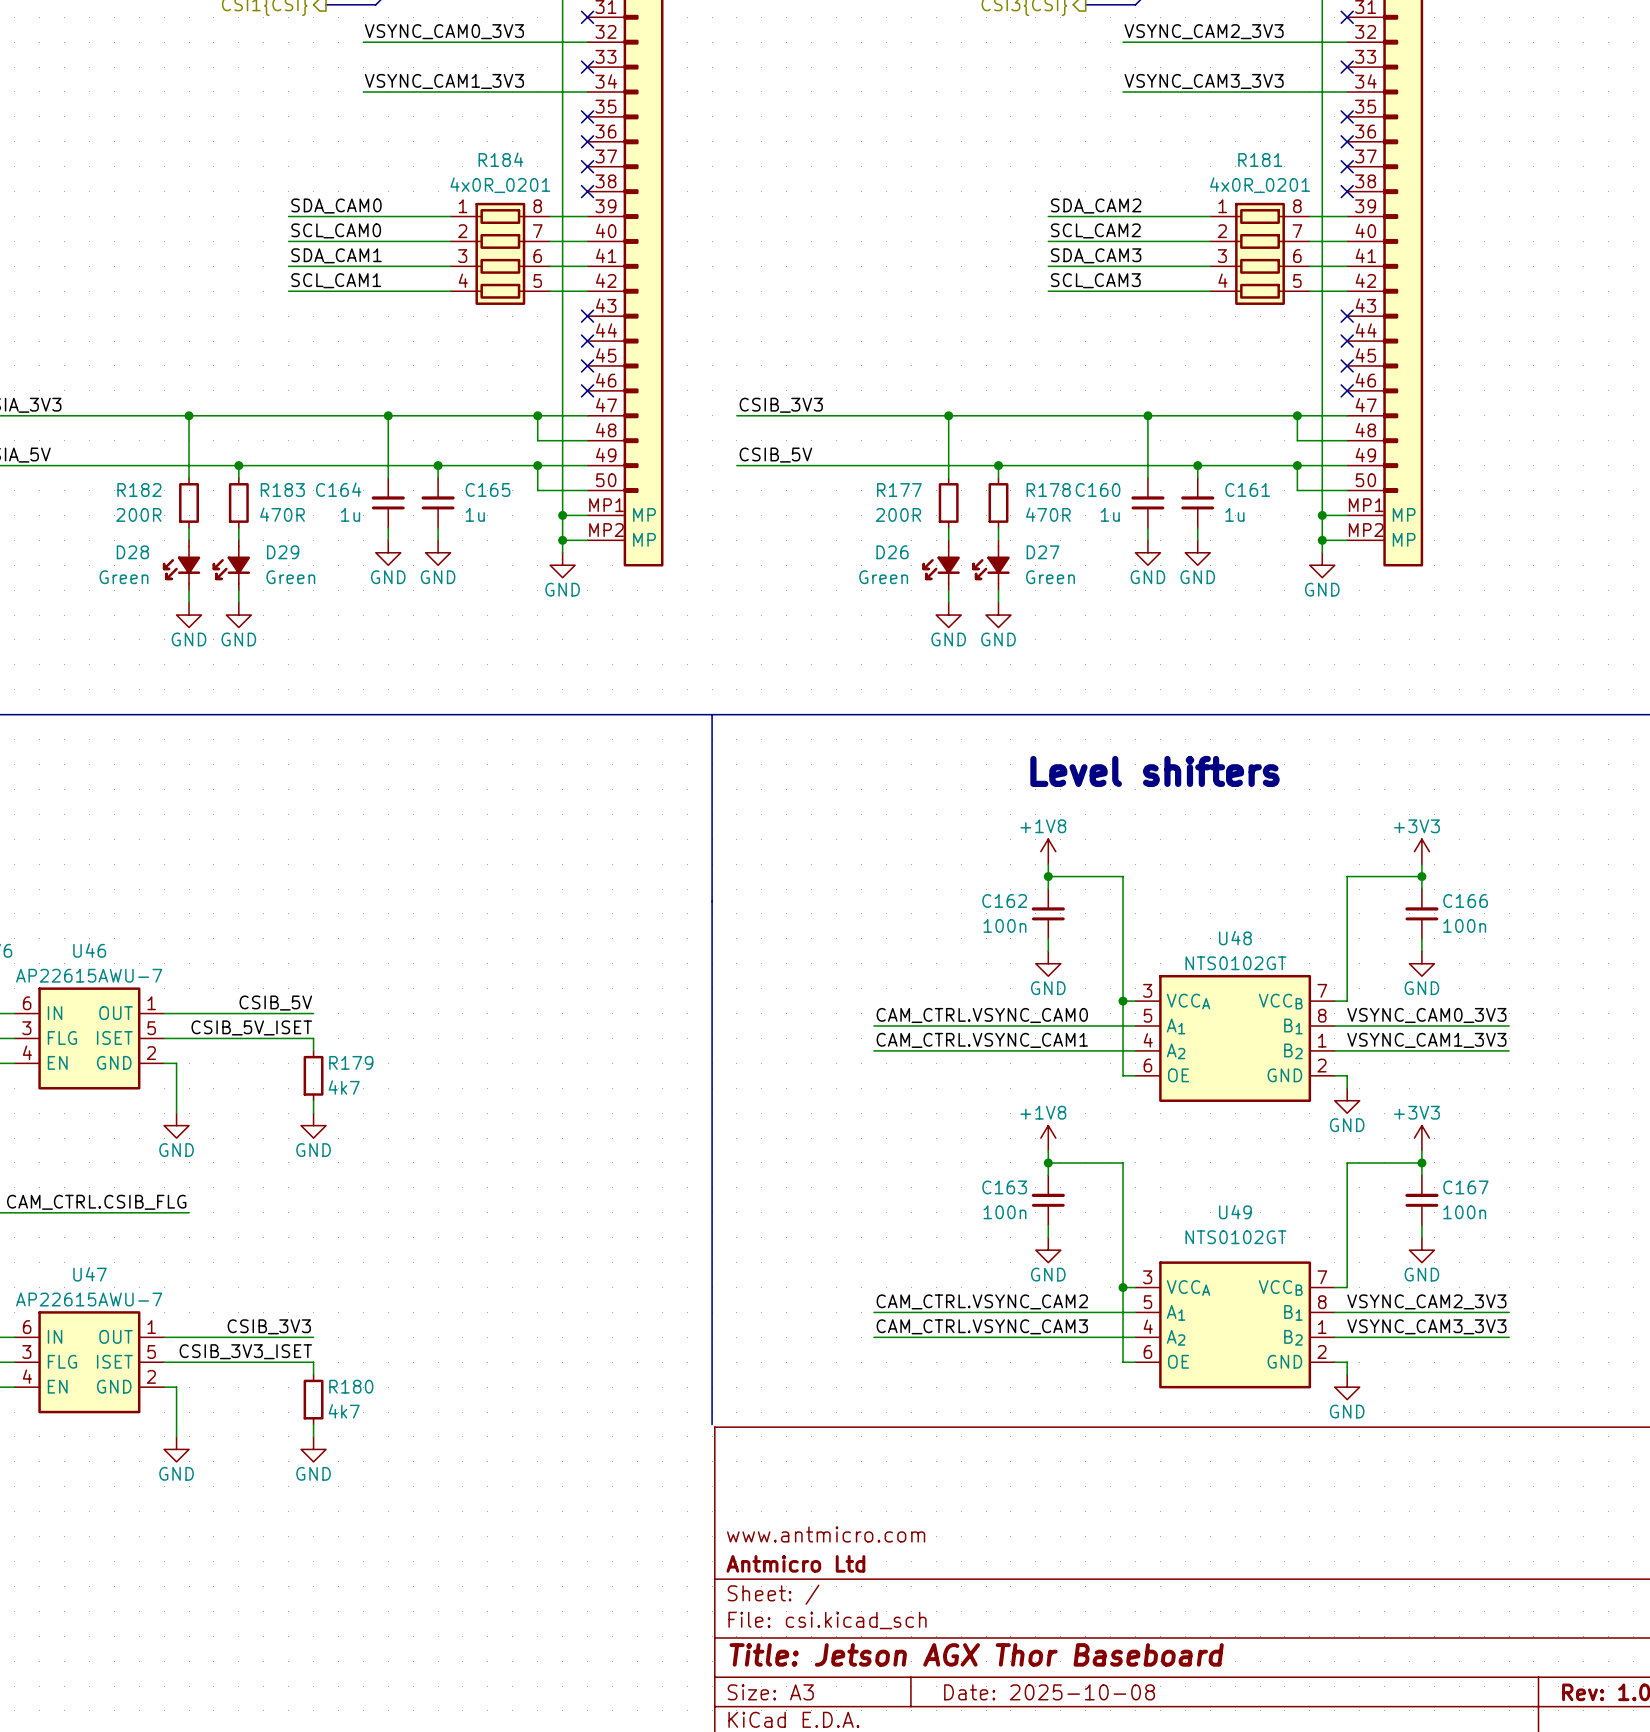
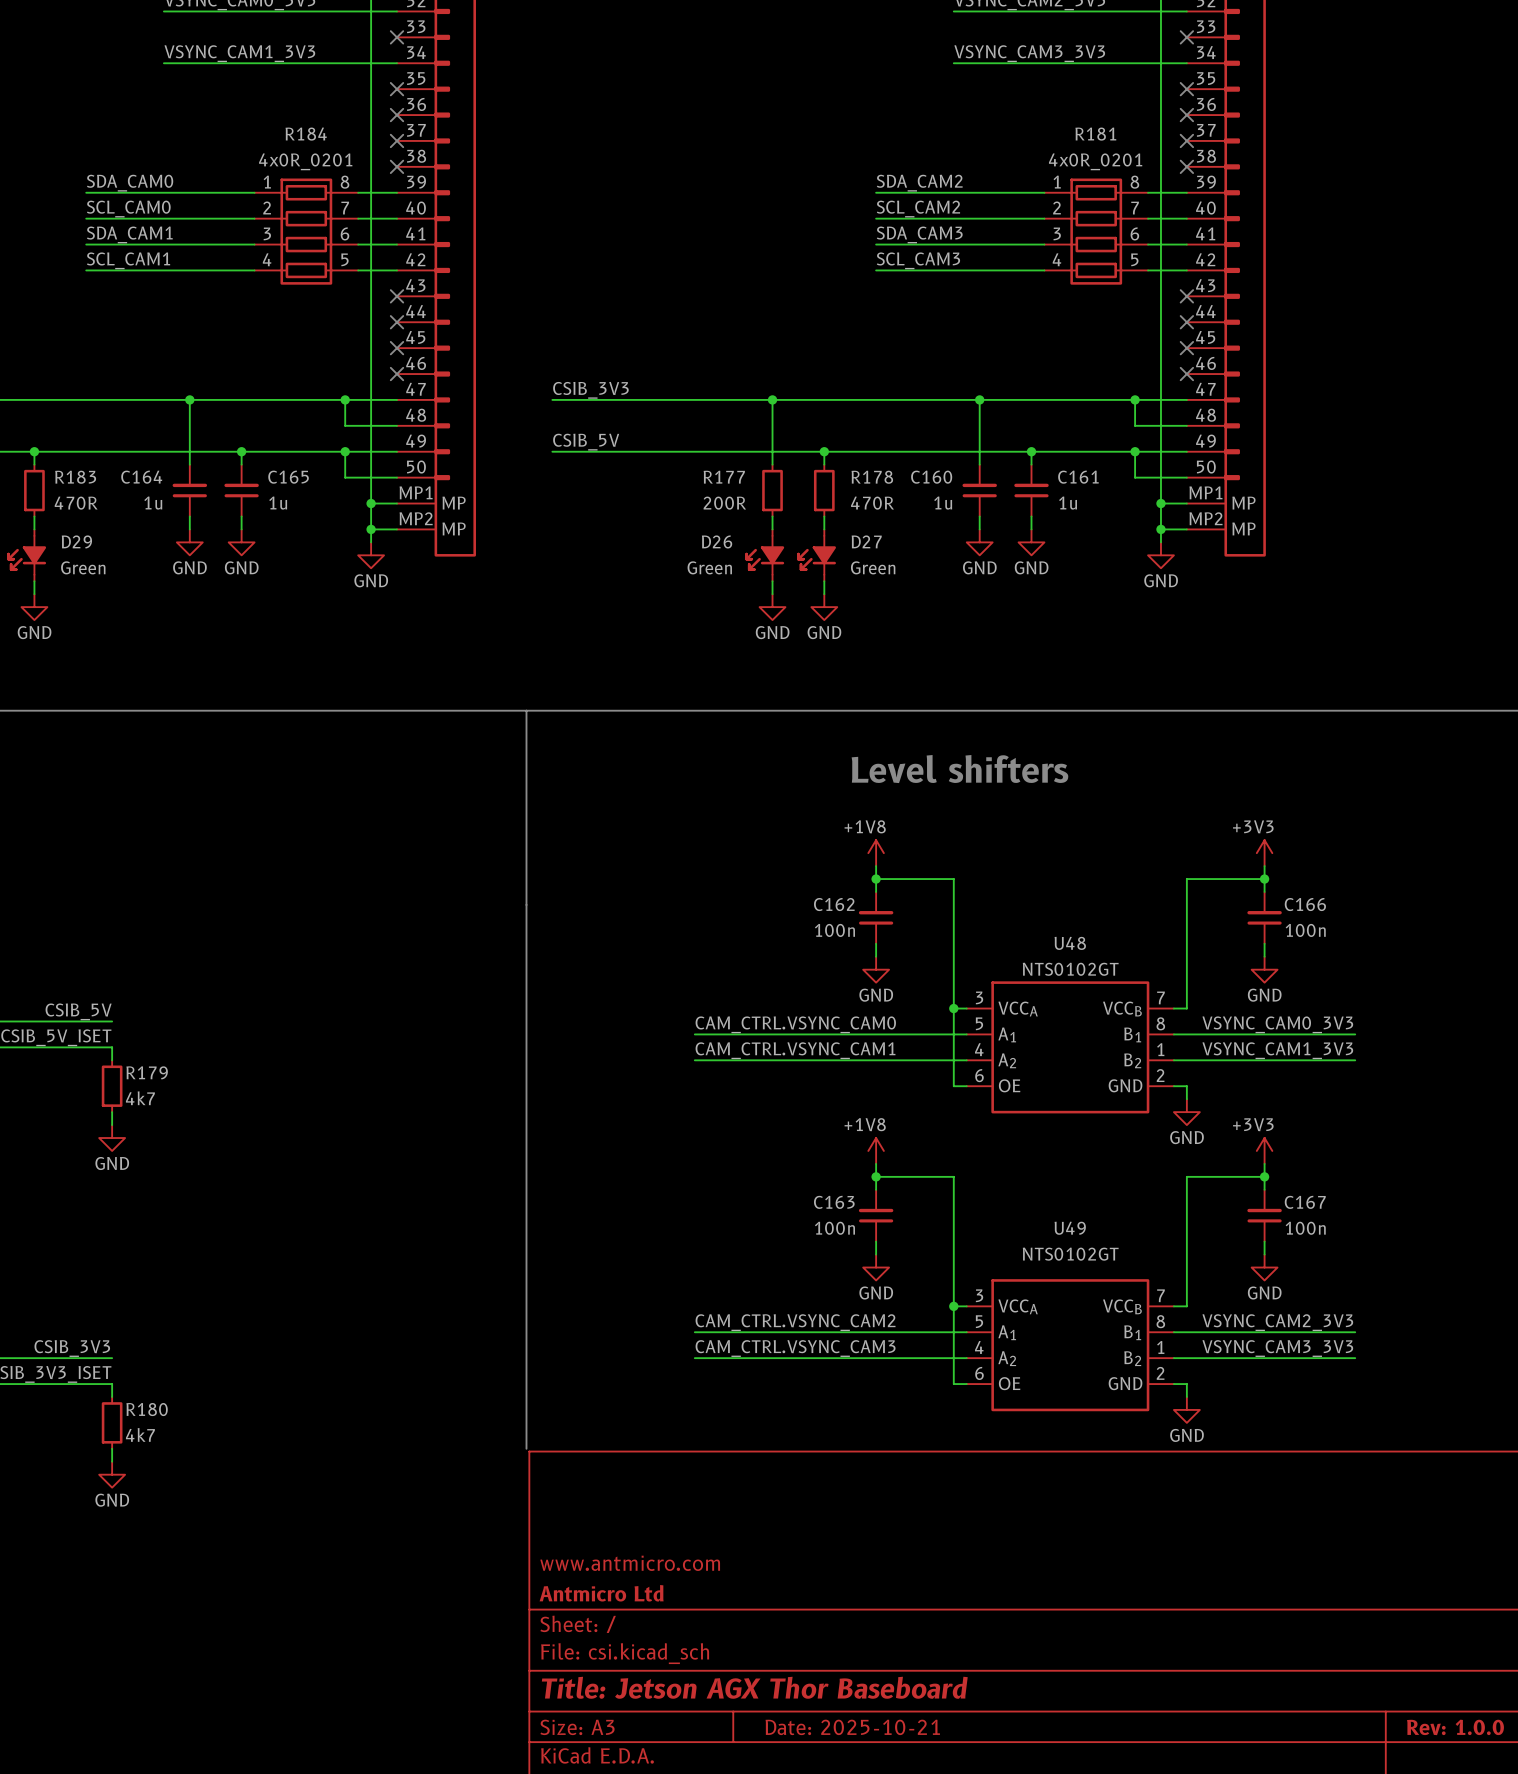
title block: Date: 2025-10-08 (1049, 1692) -> Date: 2025-10-21 (852, 1727)

